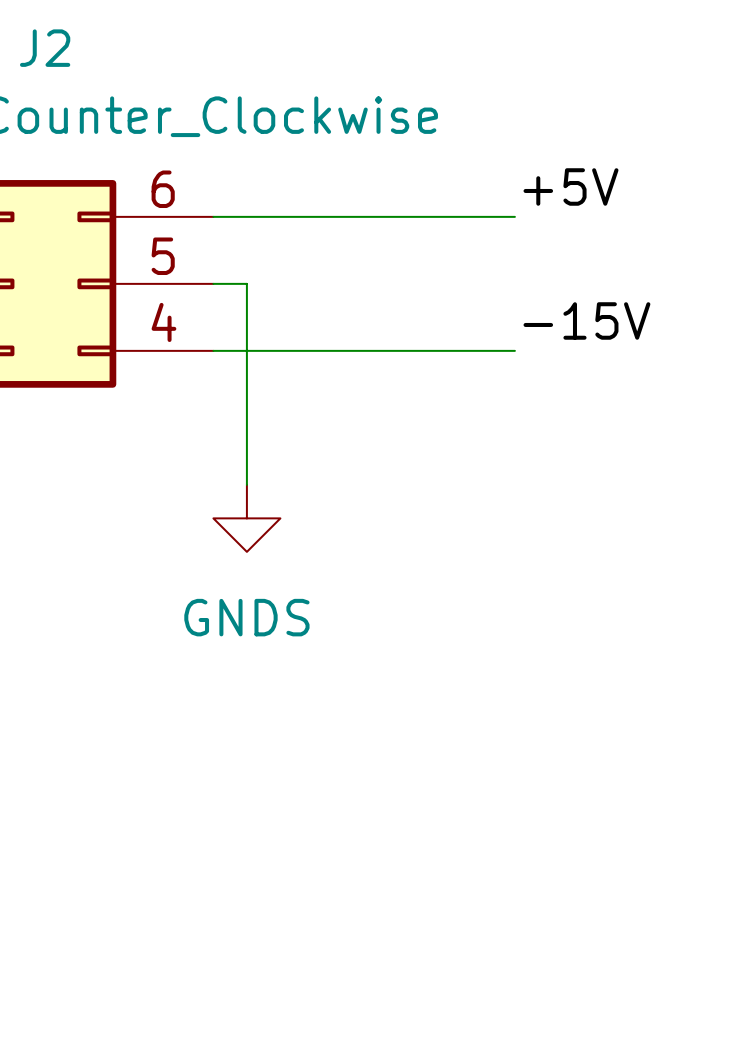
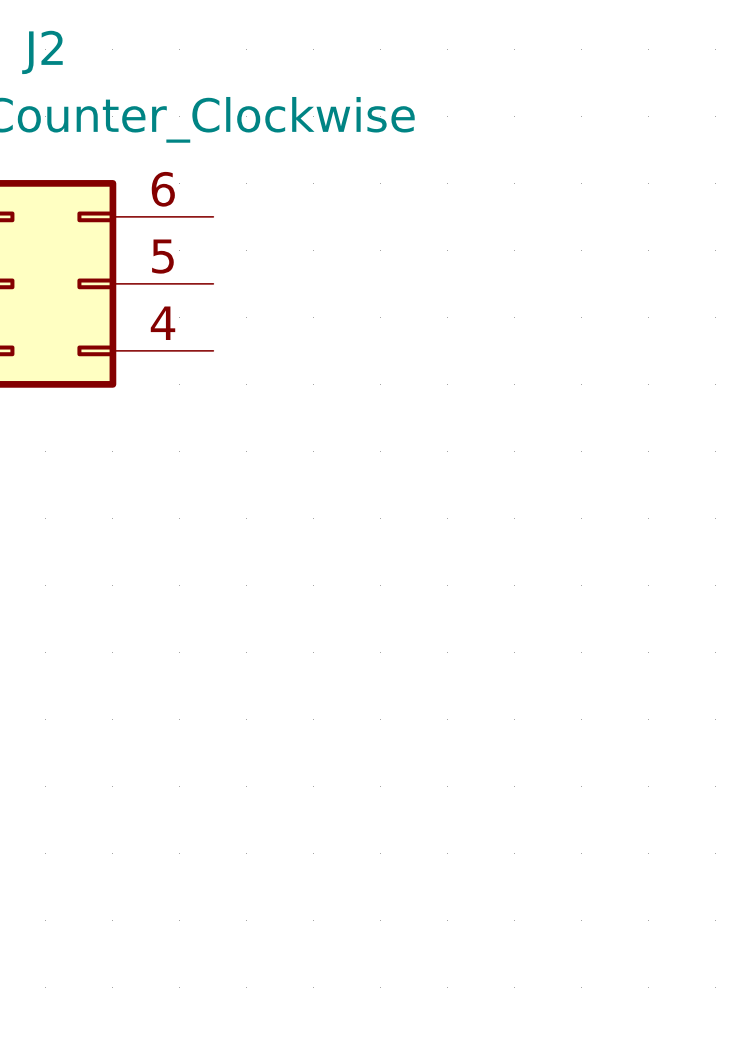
label: +5V (570, 186) -> none
wire: (213, 216) (514, 216) -> none
wire: (213, 283) (246, 283) (246, 484) -> none
label: -15V (586, 320) -> none
wire: (213, 350) (514, 350) -> none
power symbol: GNDS (246, 518) -> none

